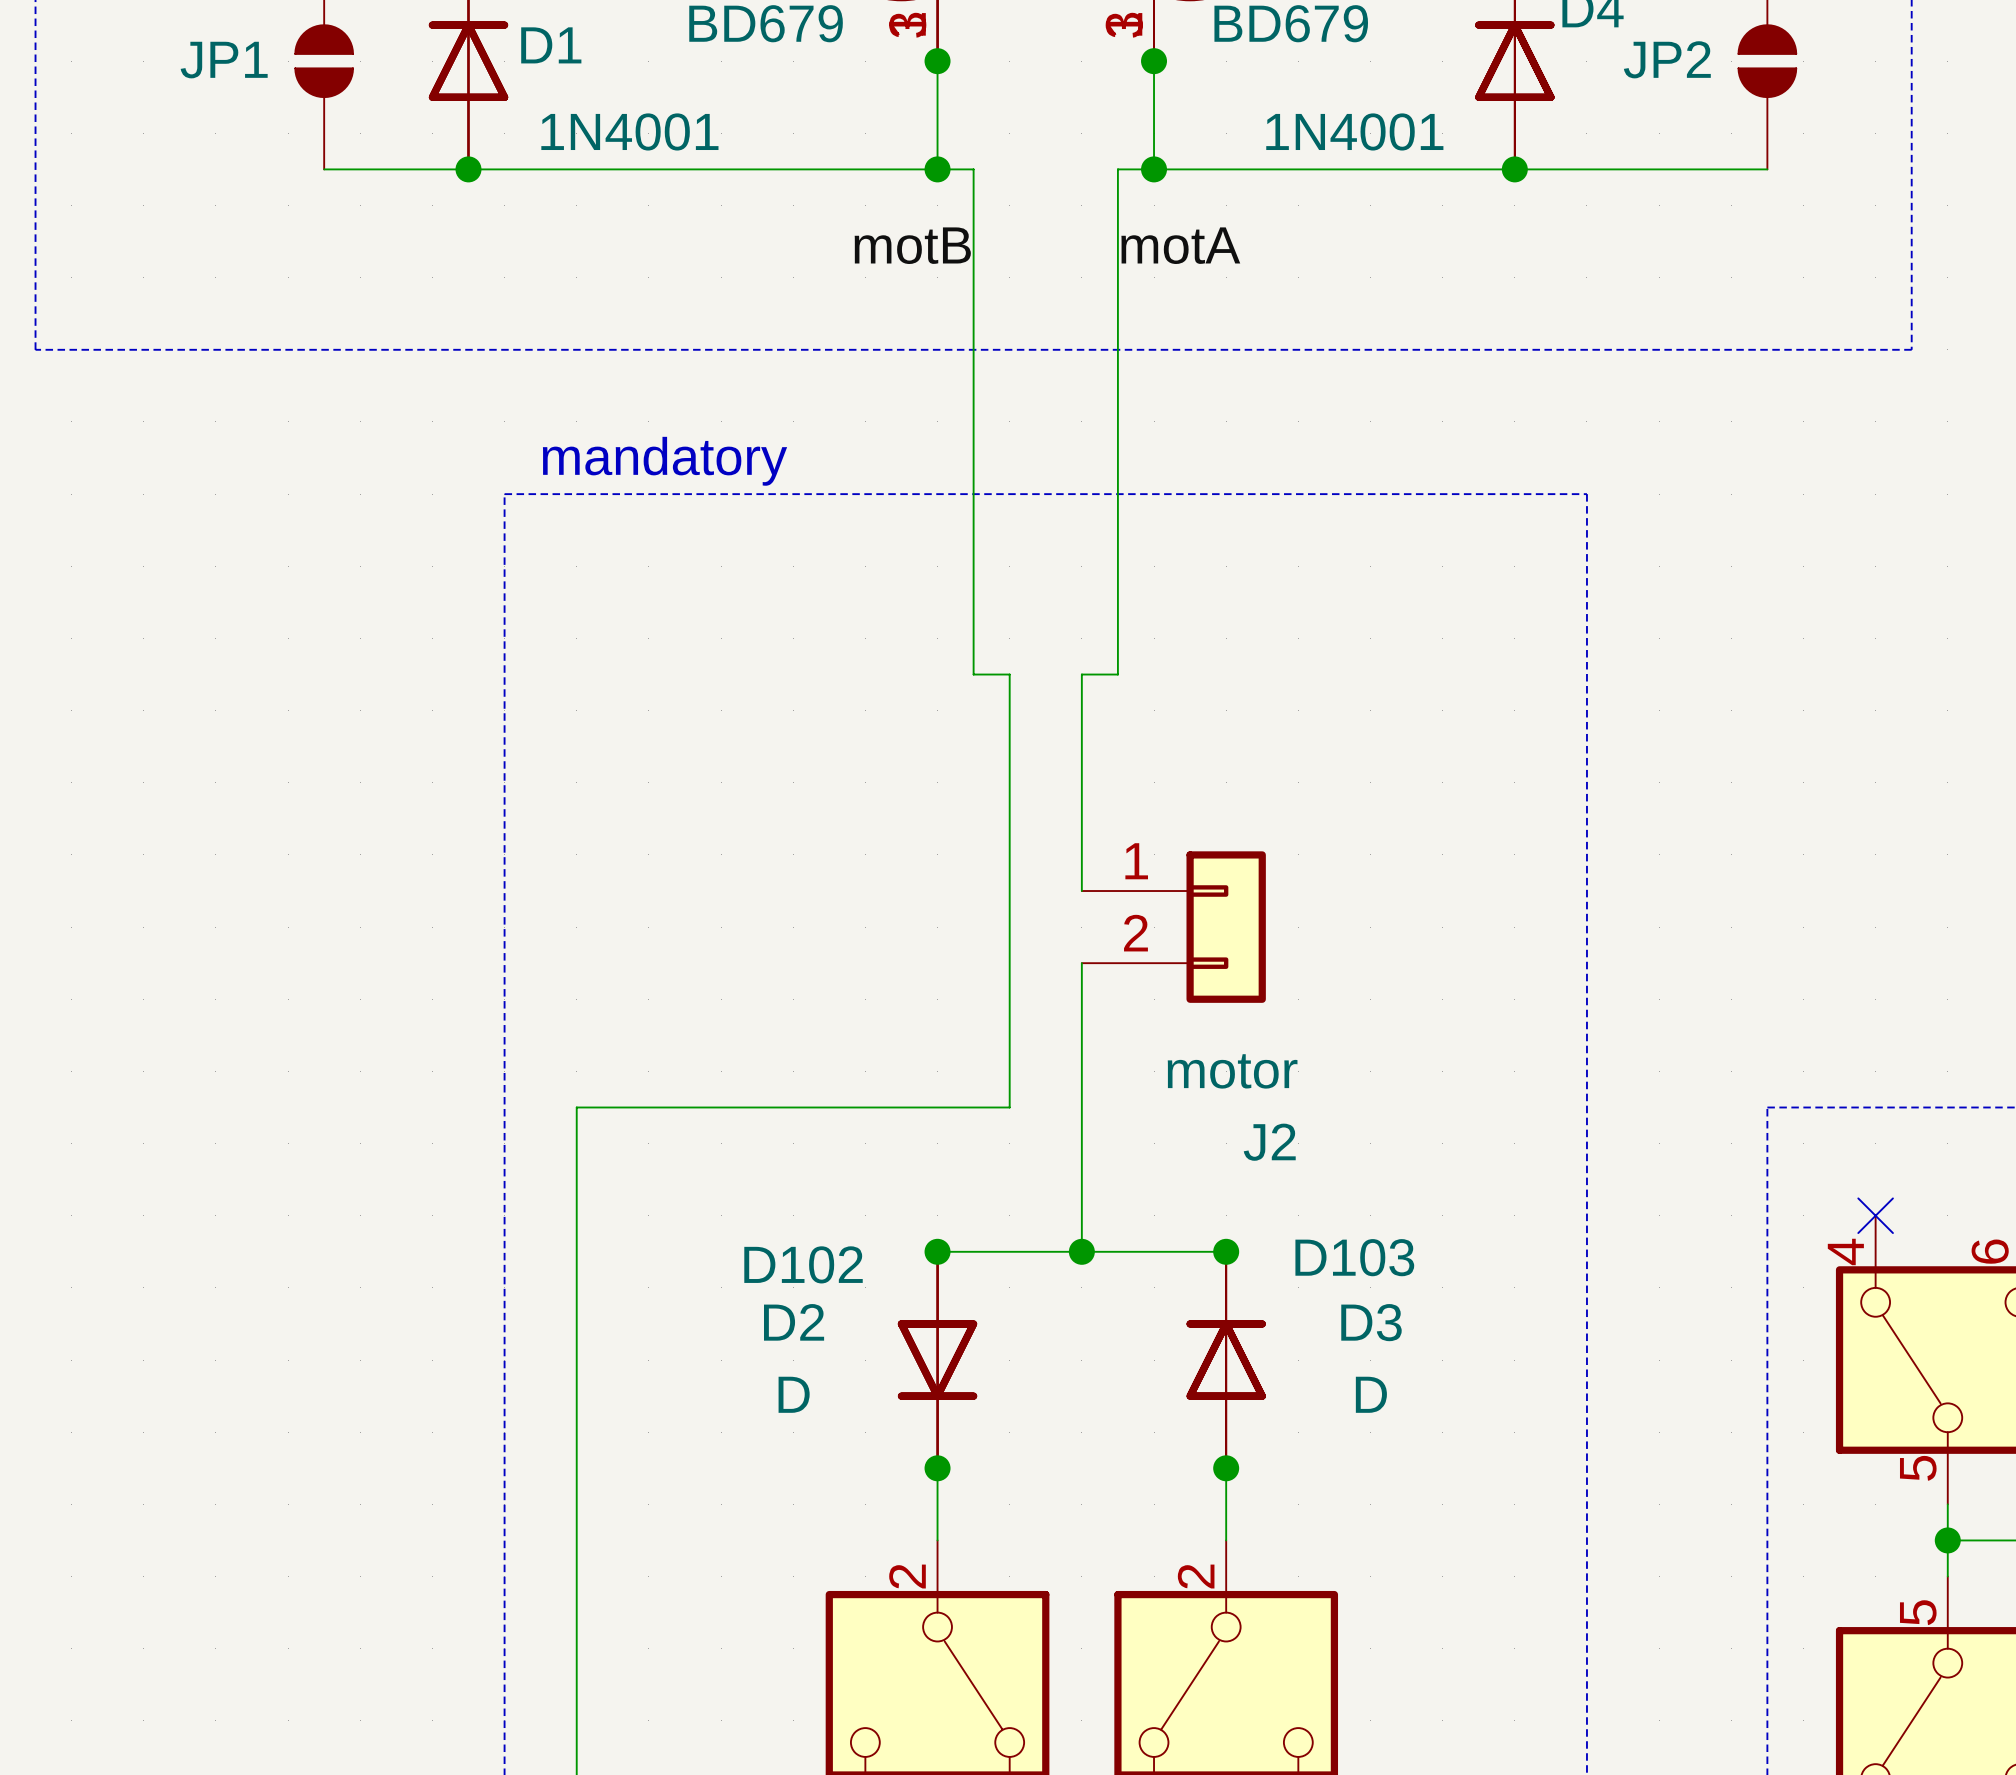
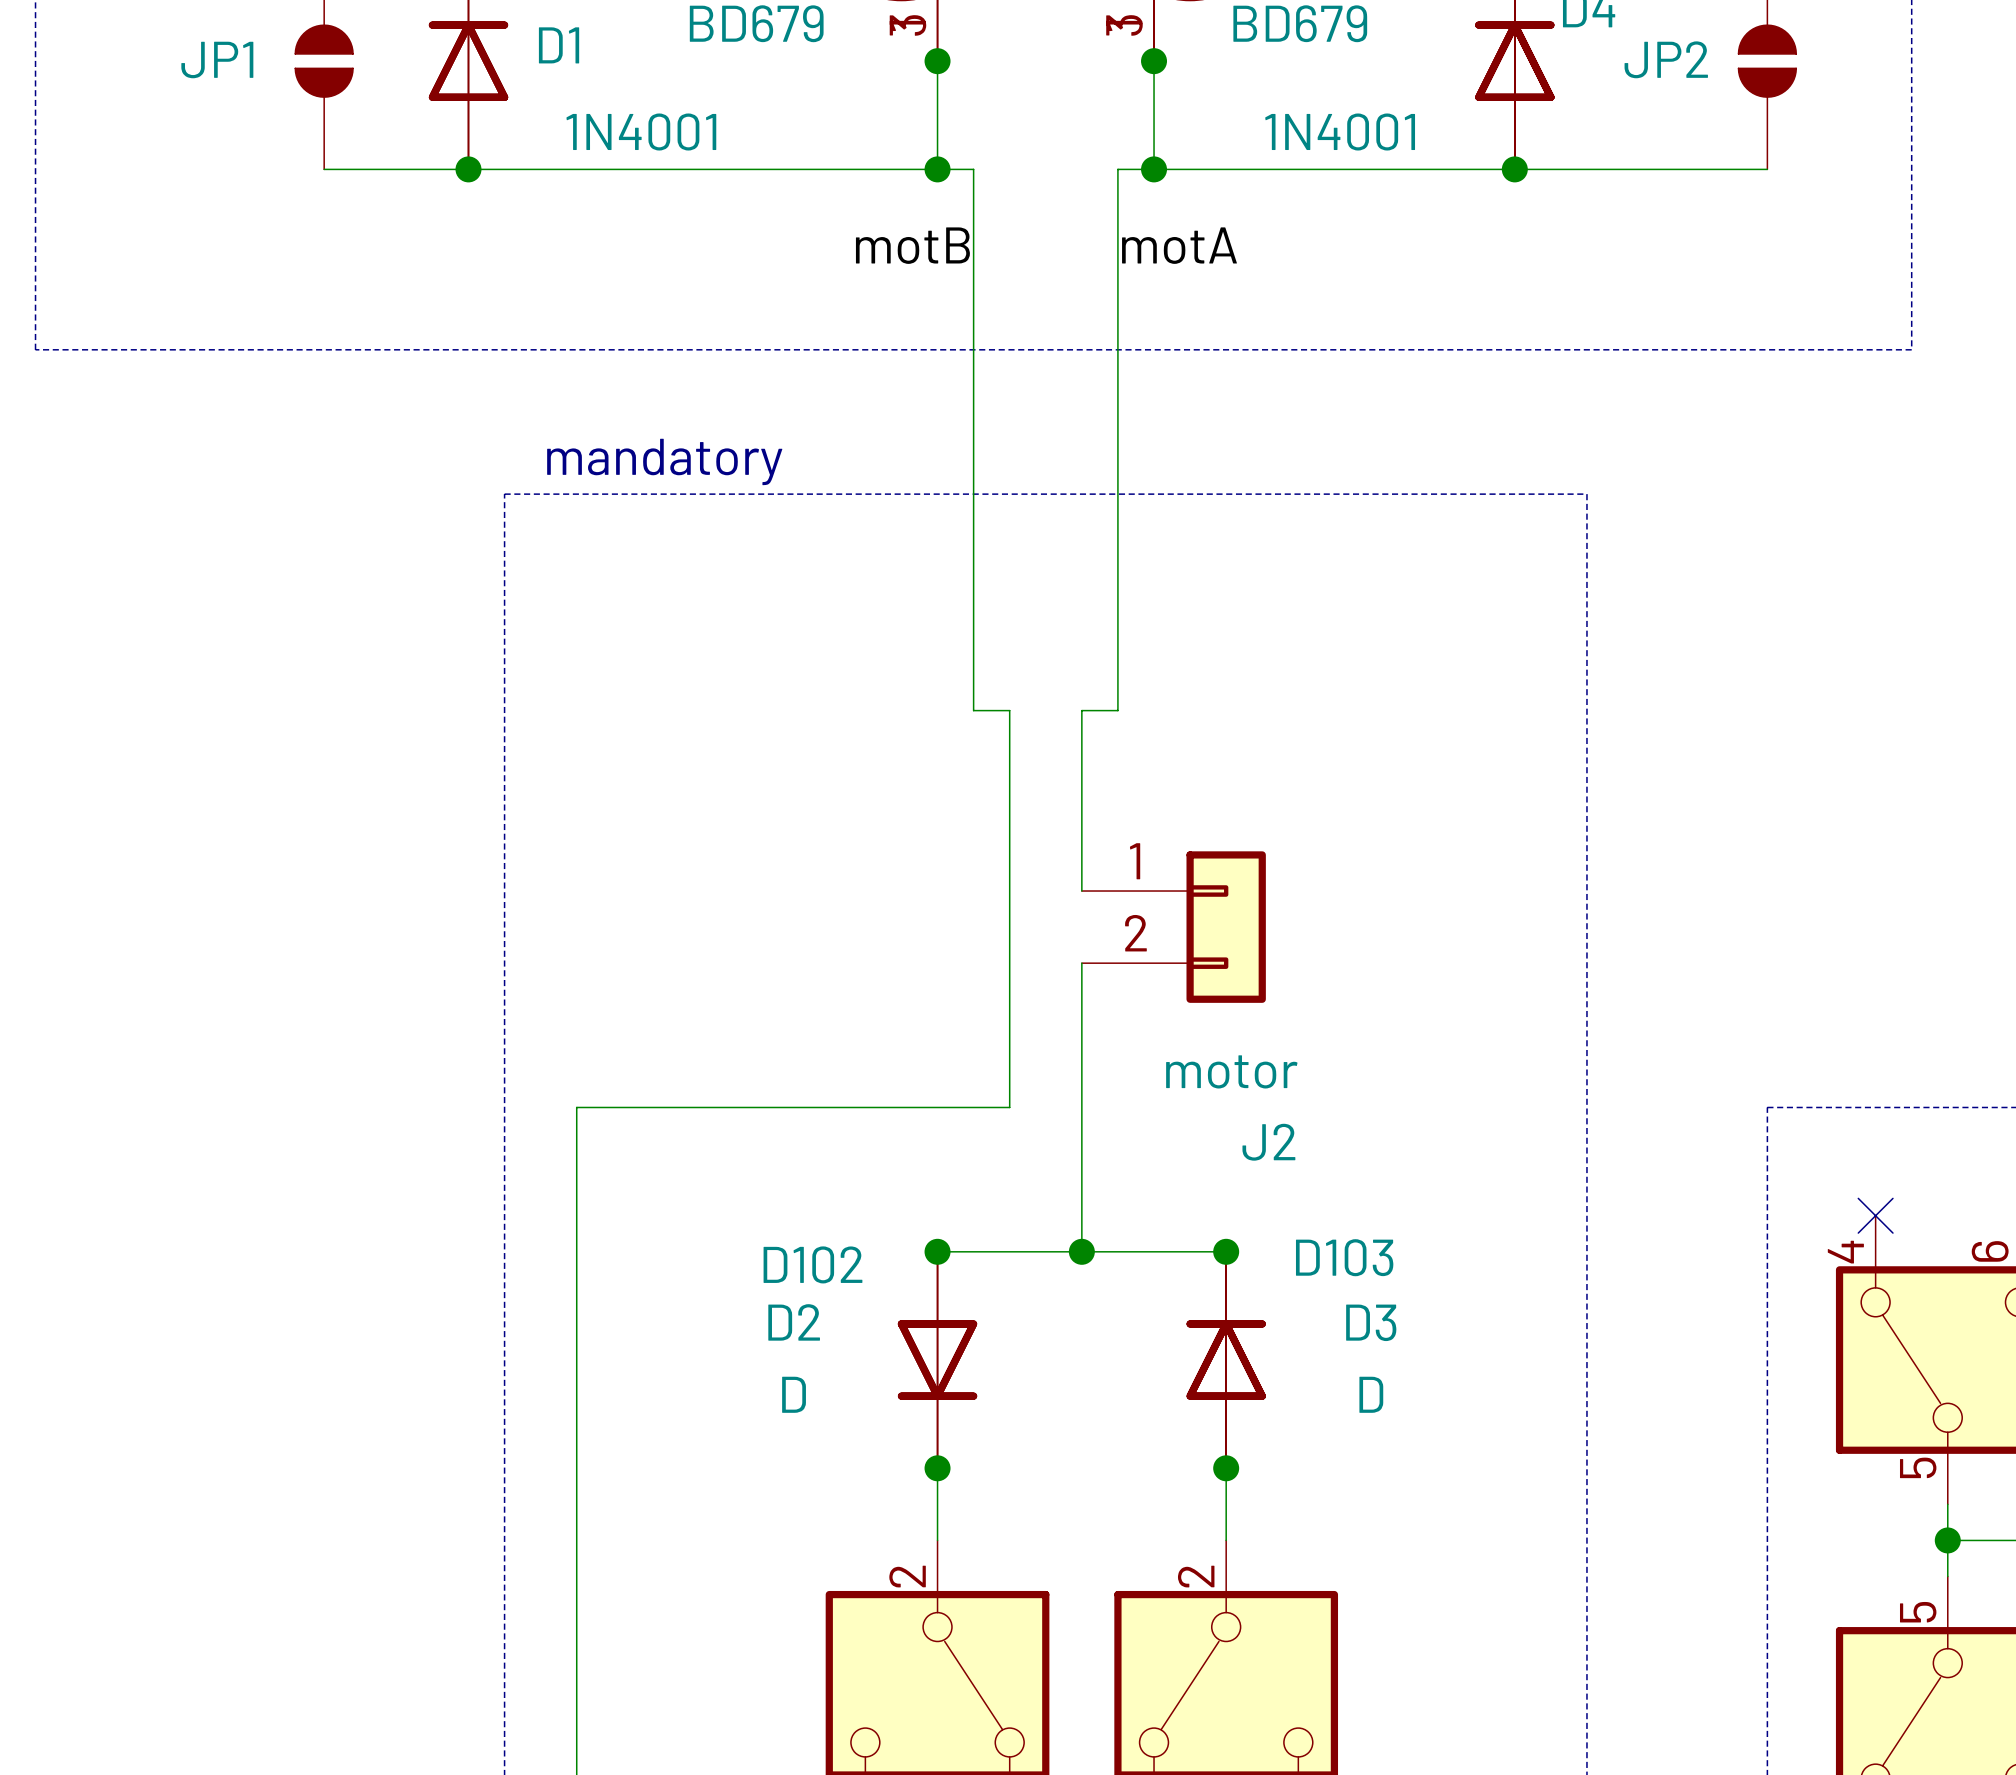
wire: (973, 674) (1009, 674) (1009, 710) -> (973, 674) (973, 710) (1009, 710)
wire: (1117, 674) (1081, 674) (1081, 710) -> (1117, 674) (1117, 710) (1081, 710)

